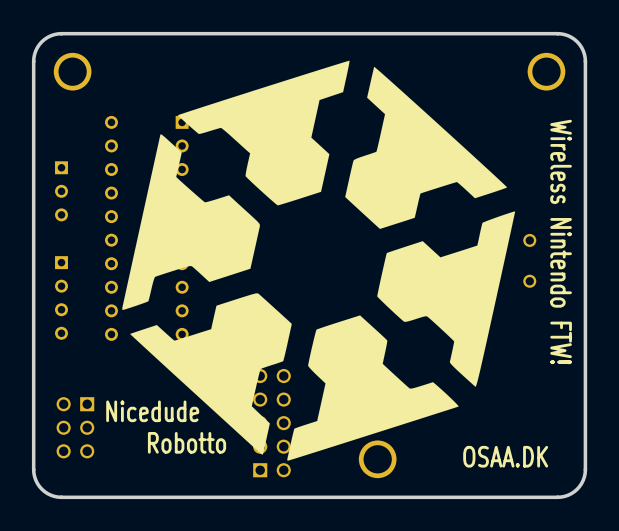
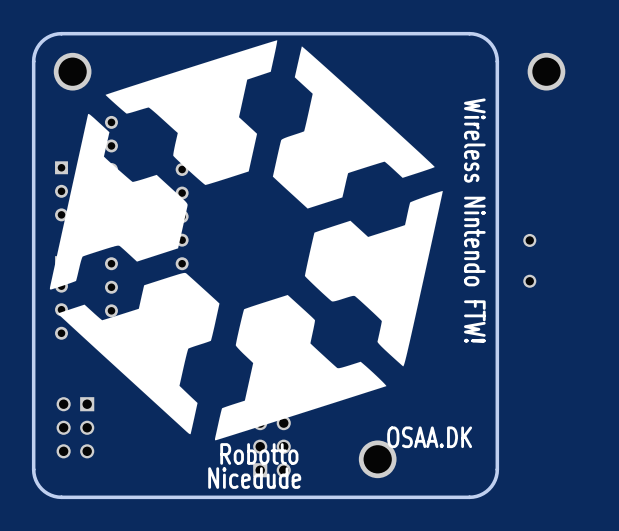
board edge: (469, 33) (564, 34) (579, 44) (585, 61) (584, 476) (577, 489) (561, 497) (469, 497) -> (469, 33) (480, 35) (489, 41) (495, 50) (497, 61) (497, 469) (495, 480) (489, 489) (480, 495) (469, 497)
text position: Wireless Nintendo FTW! (561, 241) -> Wireless Nintendo FTW! (474, 220)
drawing position: (318, 260) -> (246, 240)
text position: Nicedude (152, 411) -> Nicedude (254, 478)
text position: Robotto (187, 442) -> Robotto (259, 453)
text position: OSAA.DK (505, 456) -> OSAA.DK (429, 437)

